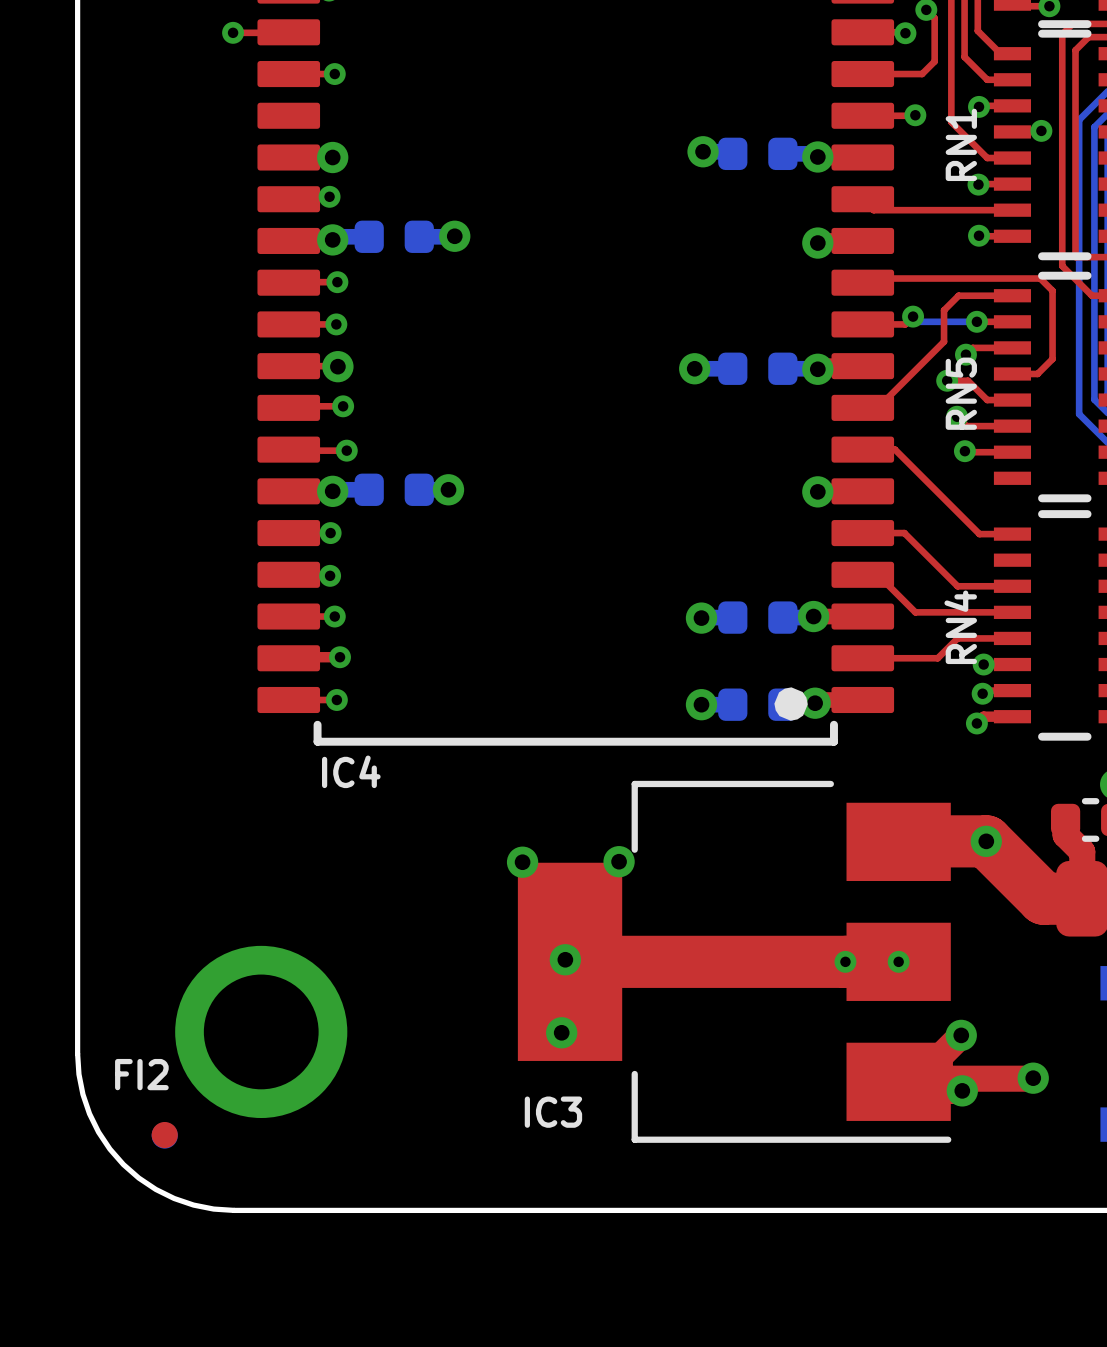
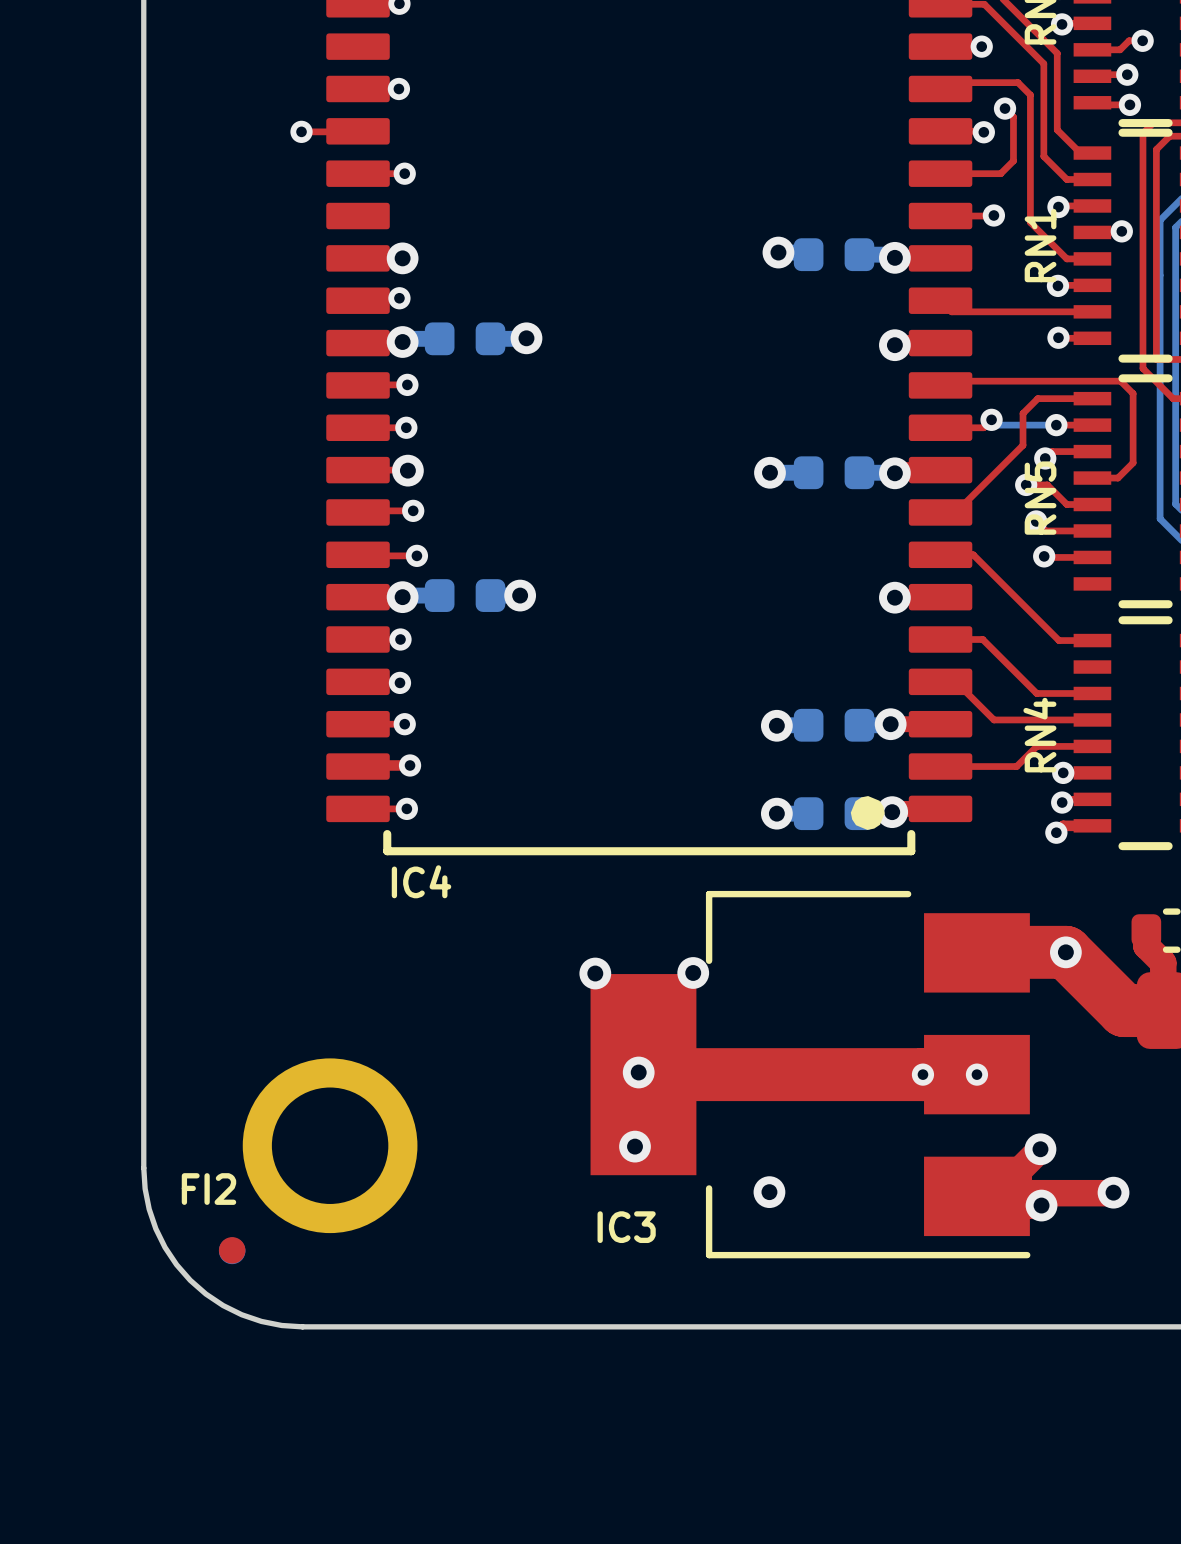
via: none -> (769, 1192)

